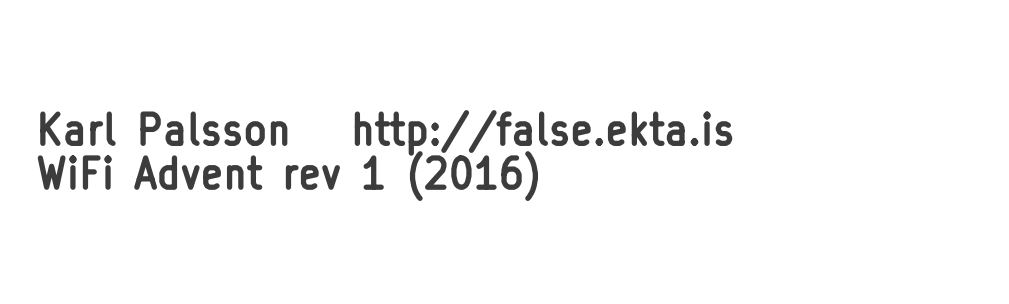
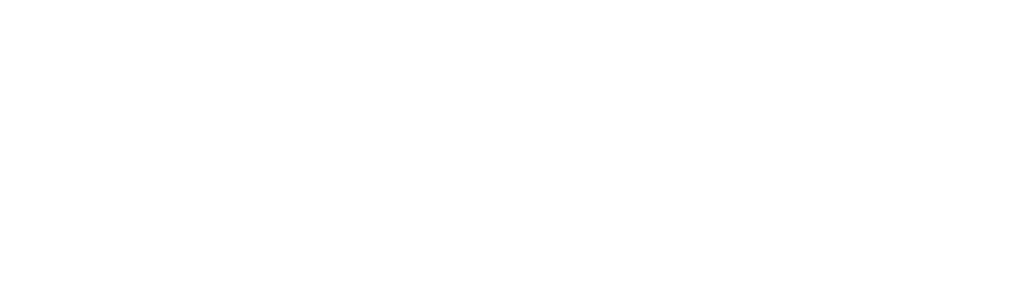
text: Karl Palsson http://false.ekta.is (386, 132) -> none
text: WiFi Advent rev 1 (2016) (287, 176) -> none

